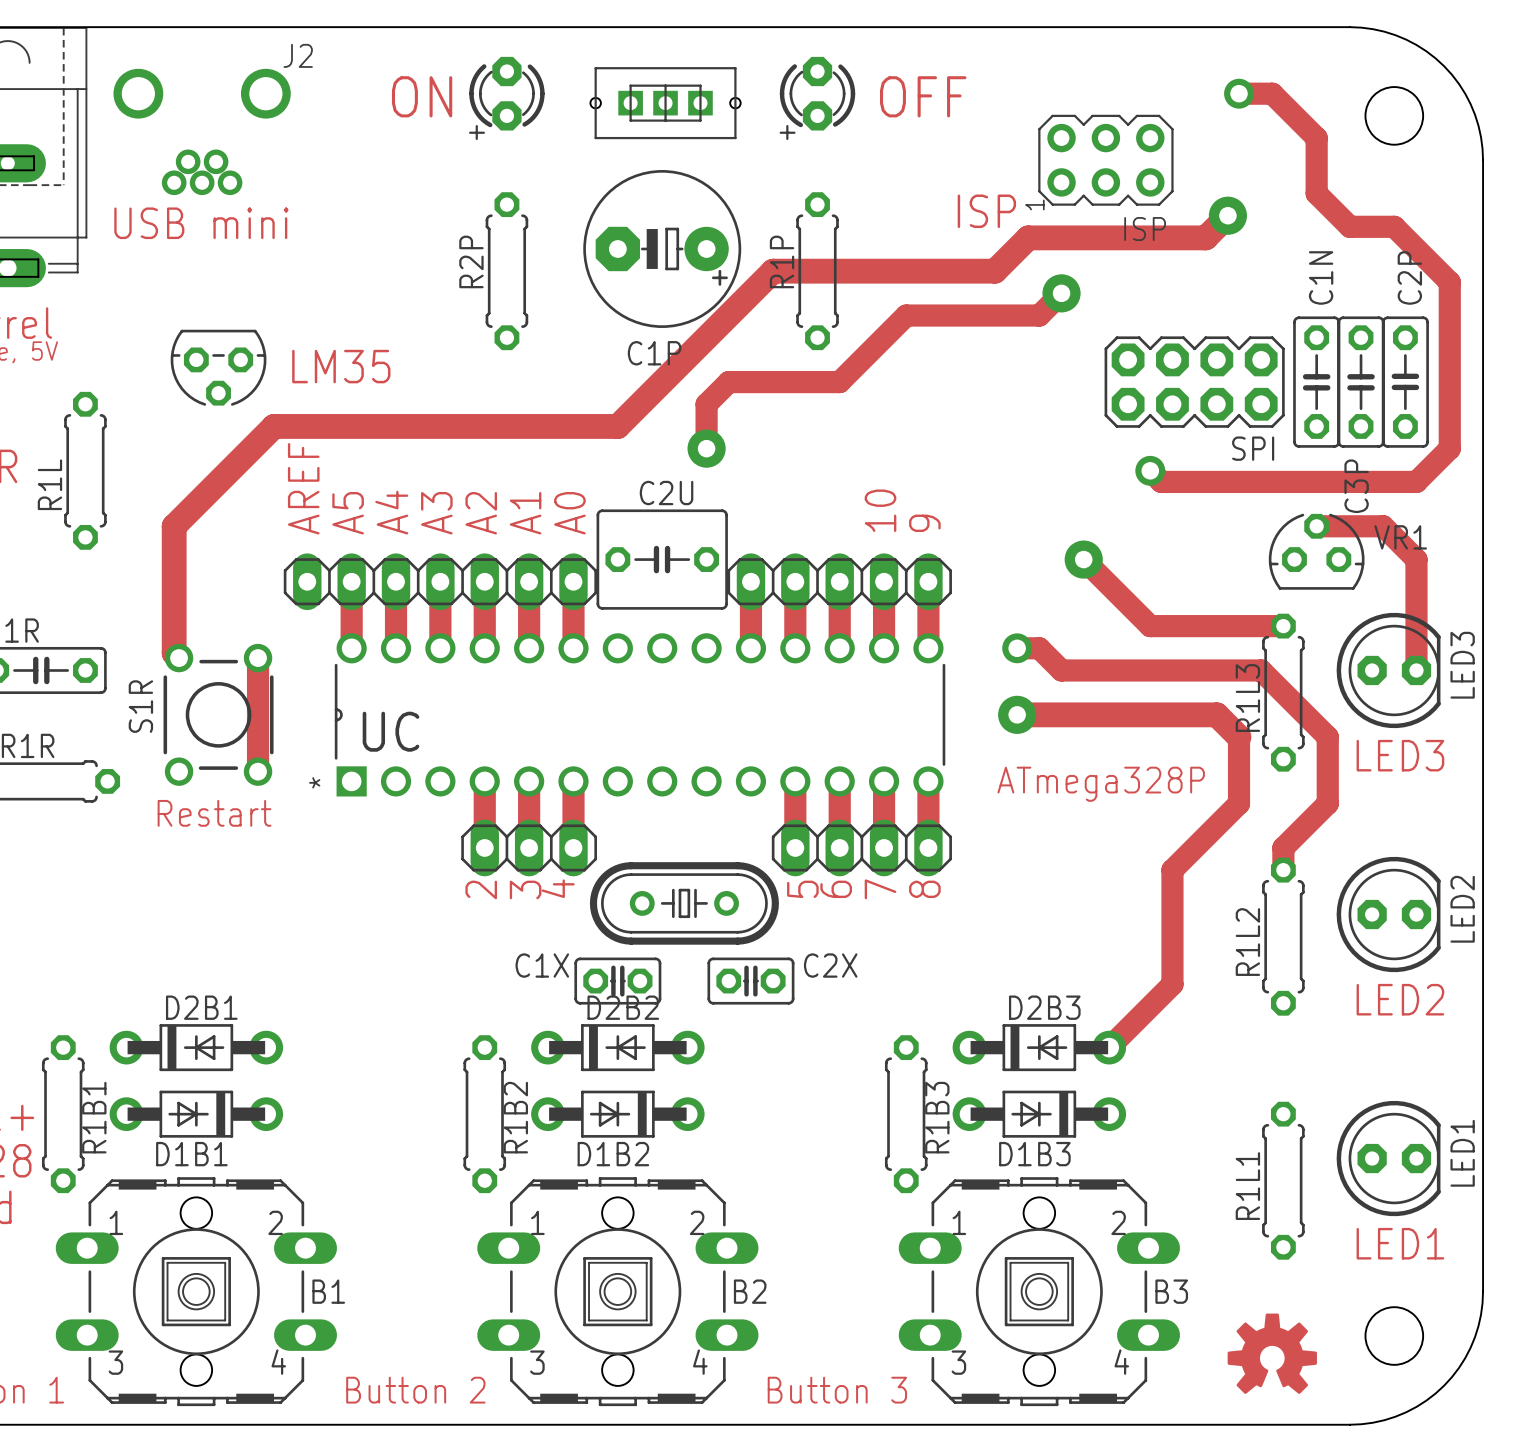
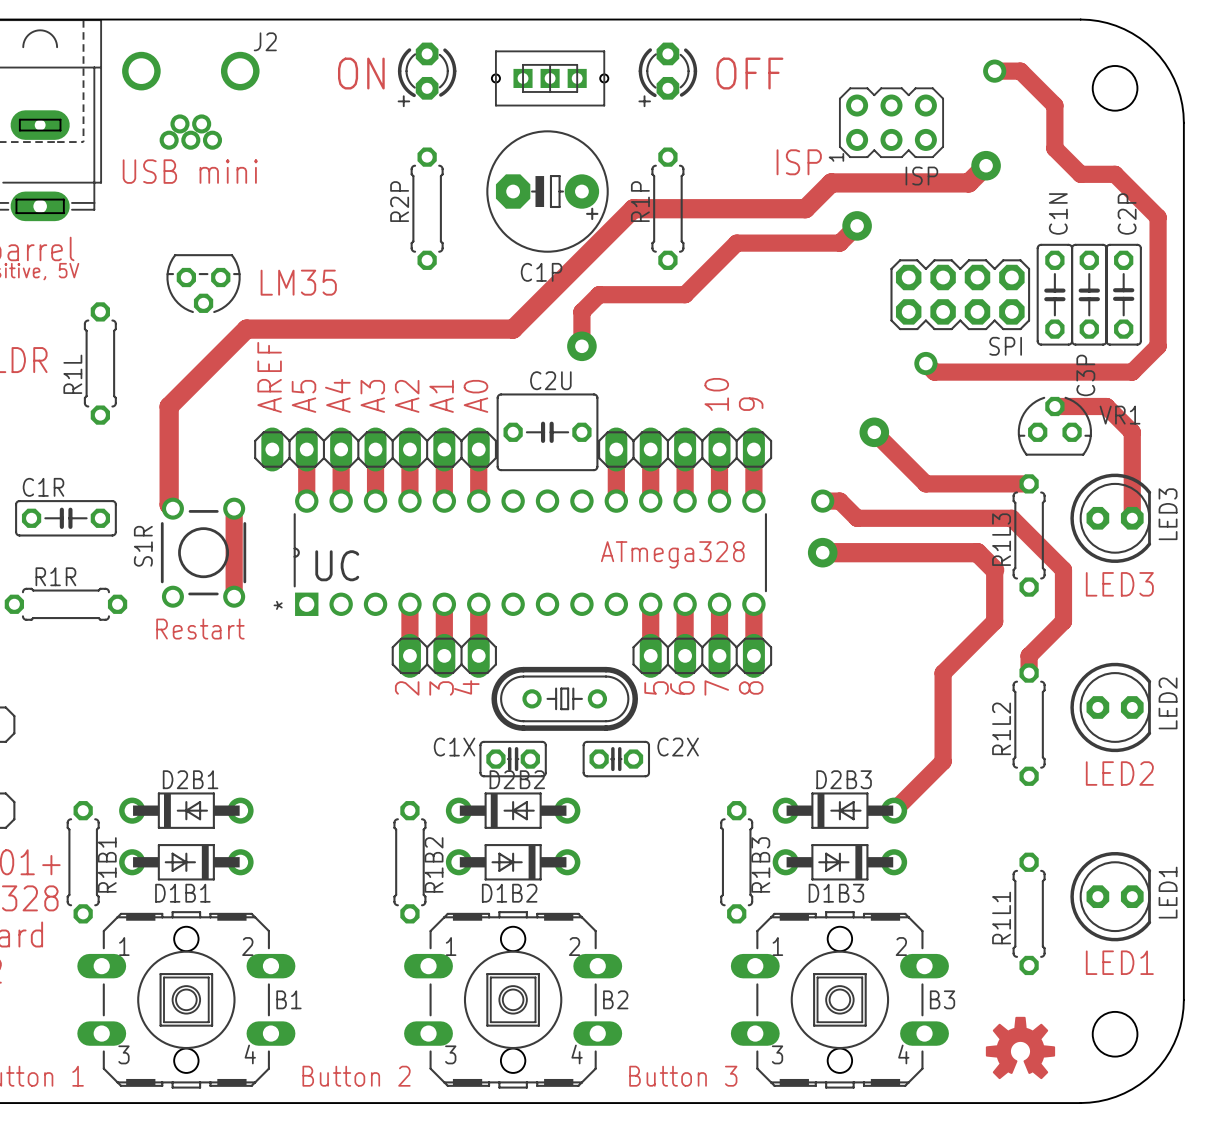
text: none -> ATmega328 (672, 554)
text: ATmega328P (1101, 784) -> none

